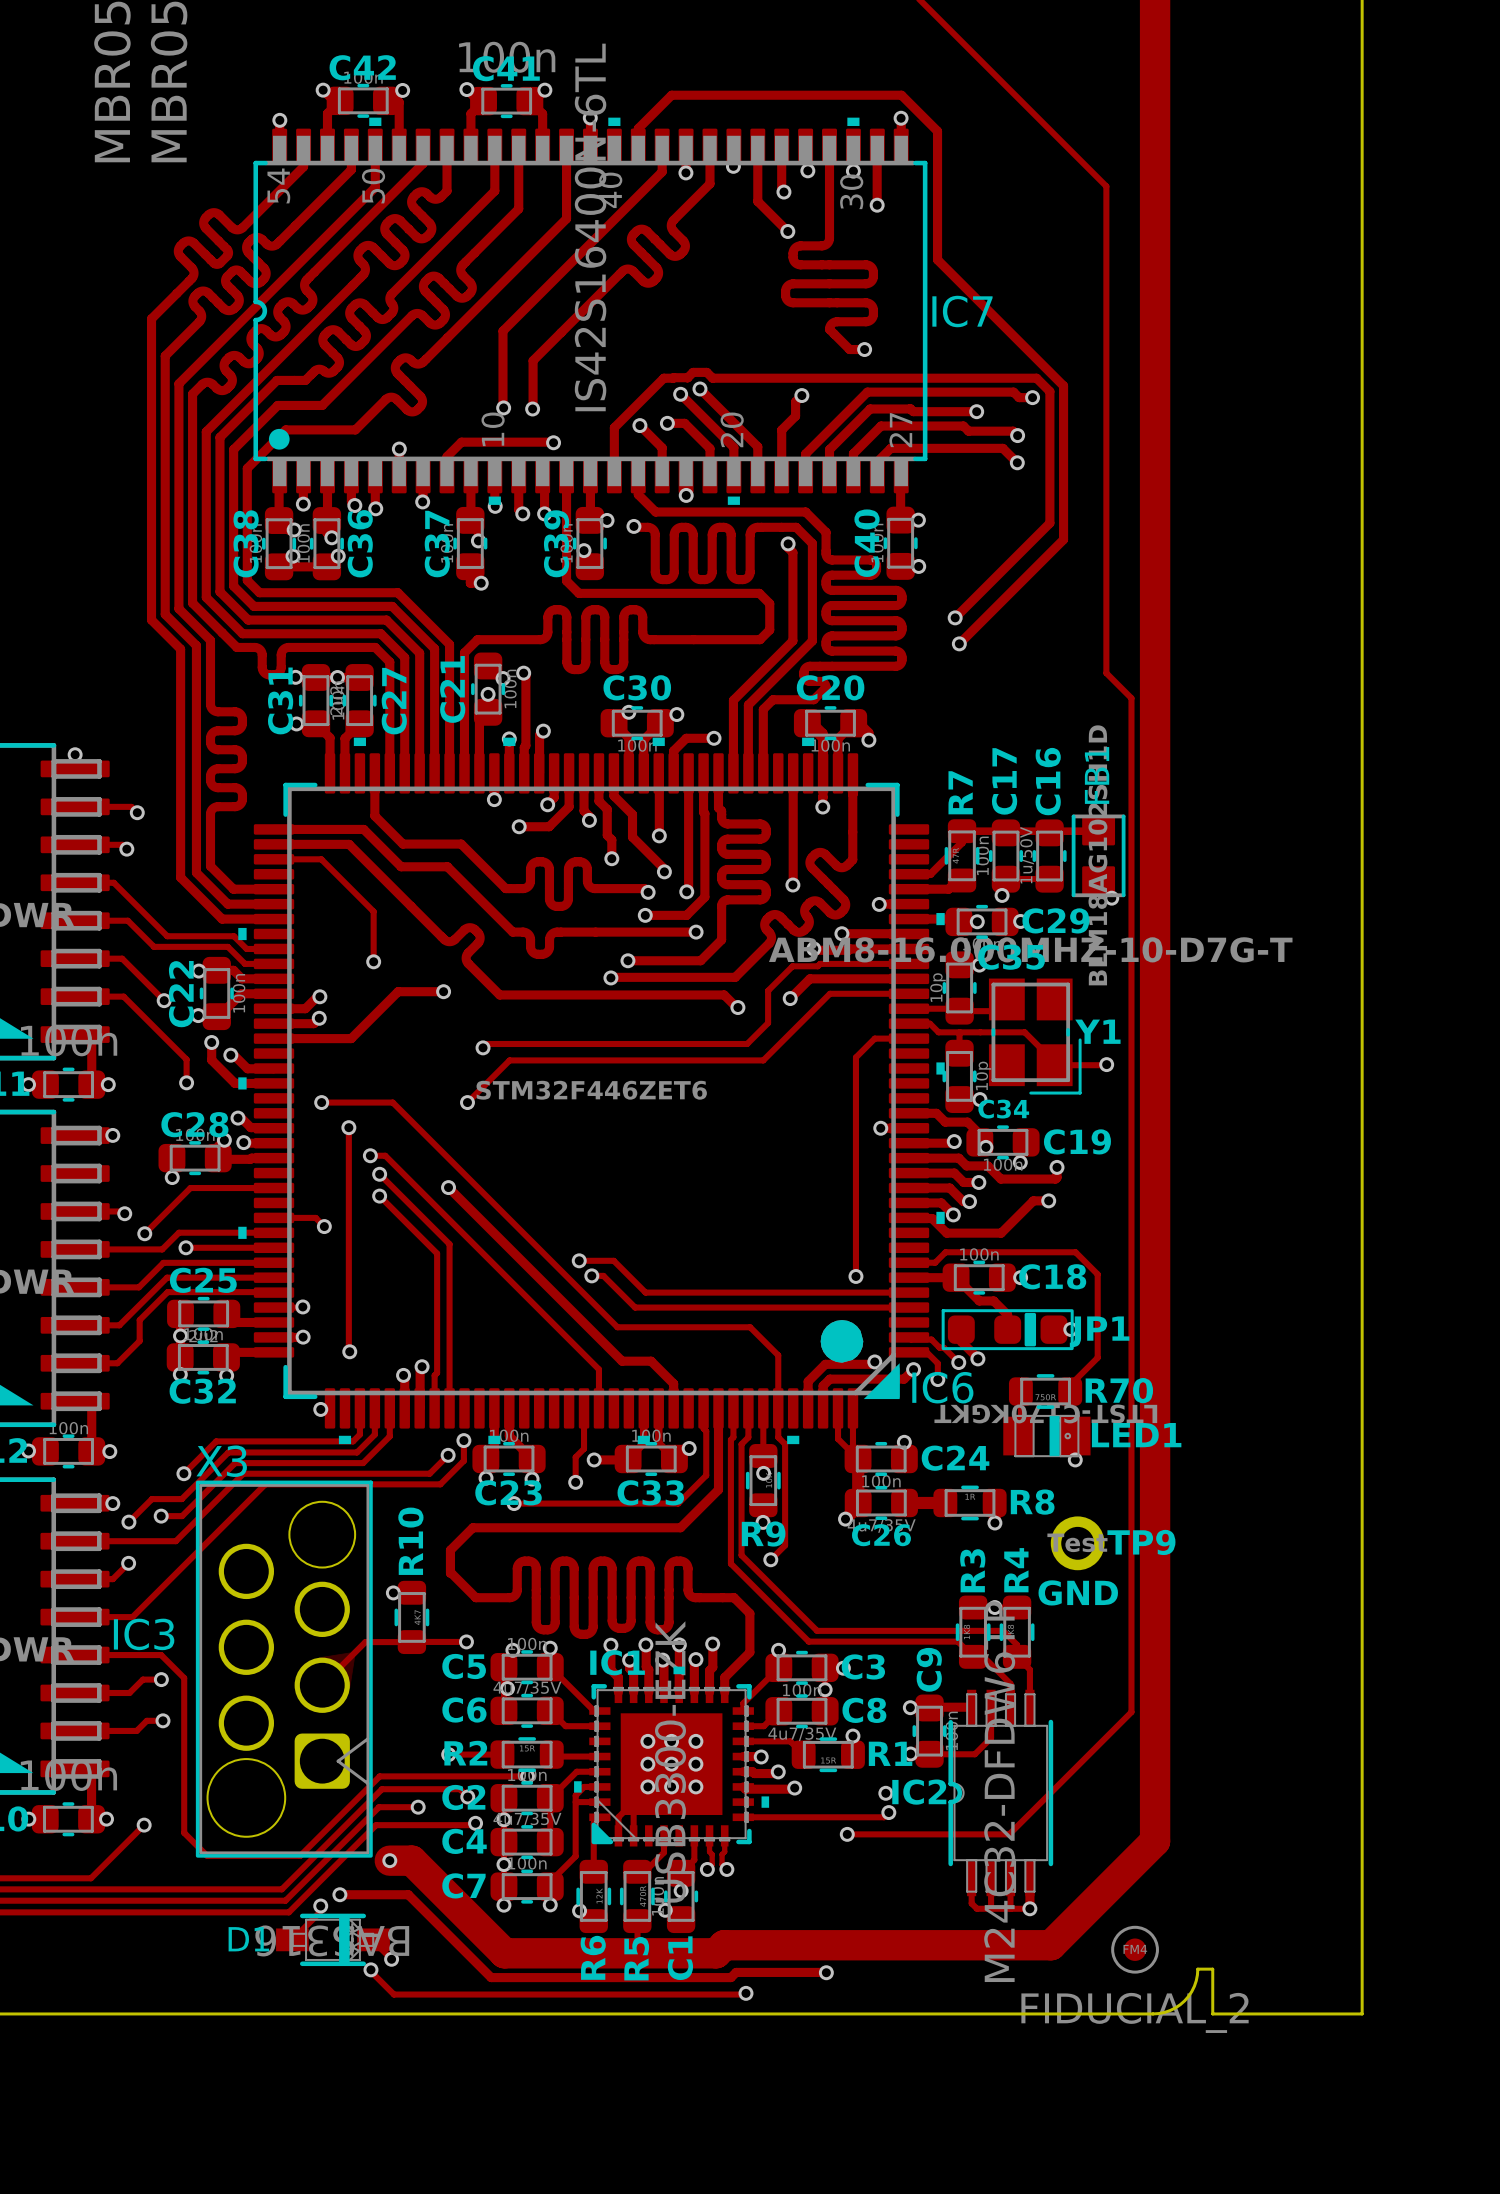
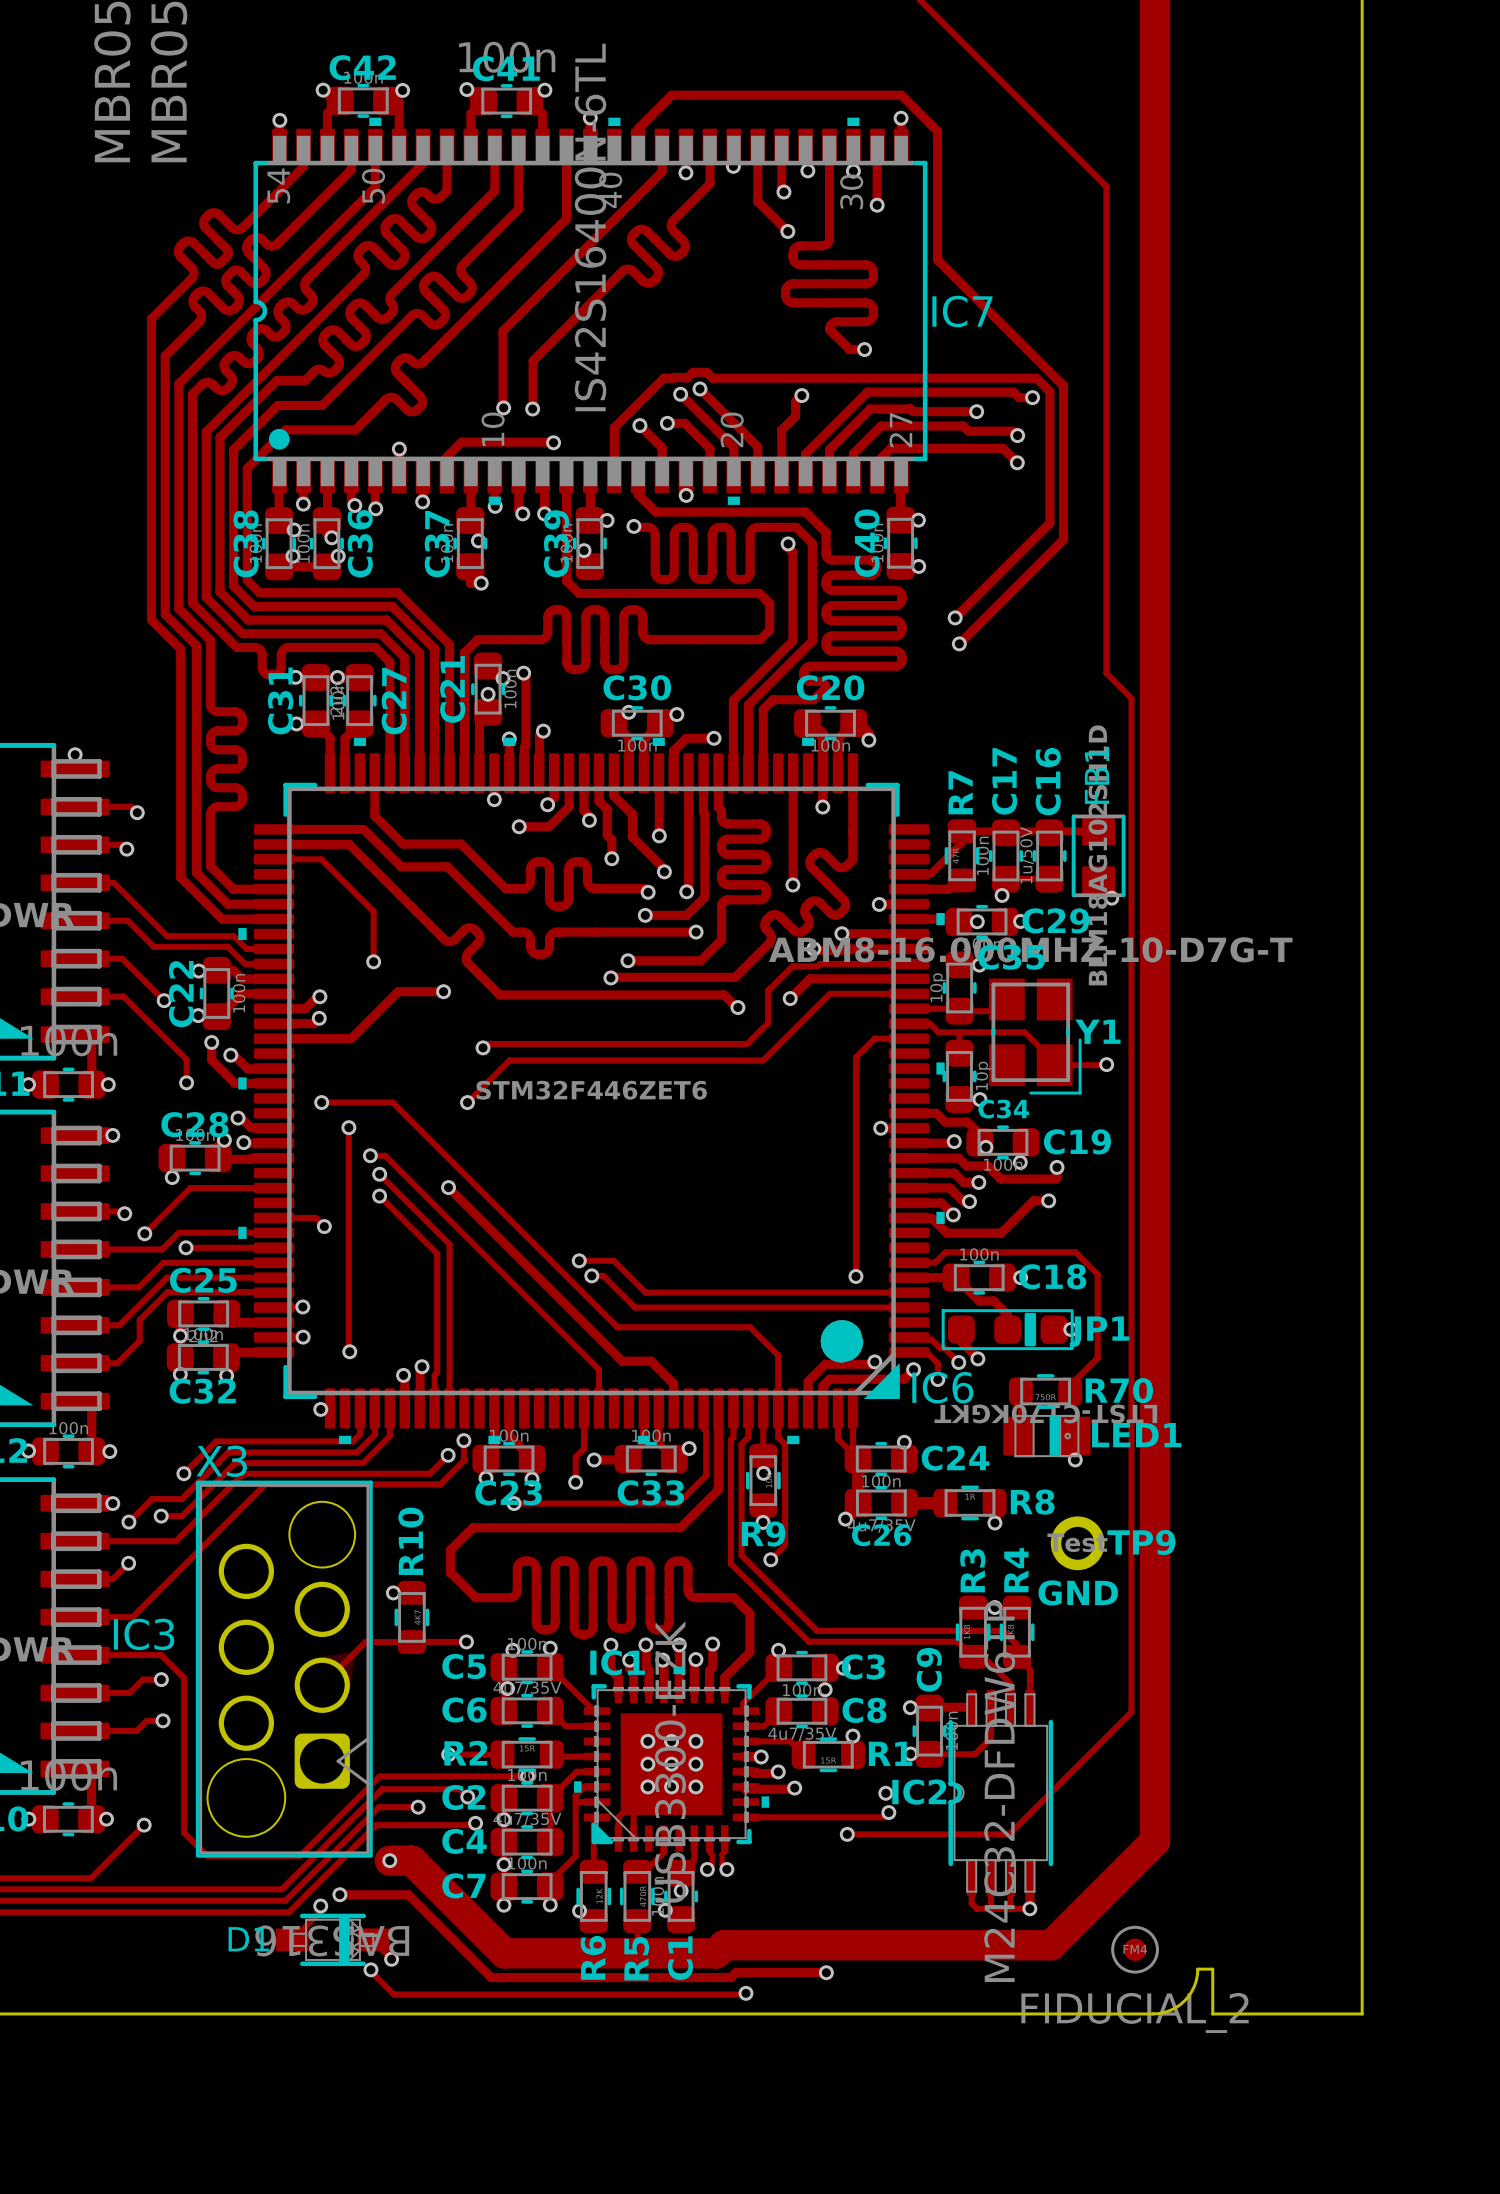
IC1 footprint: [574, 1666, 770, 1847] -> [574, 1666, 770, 1852]

